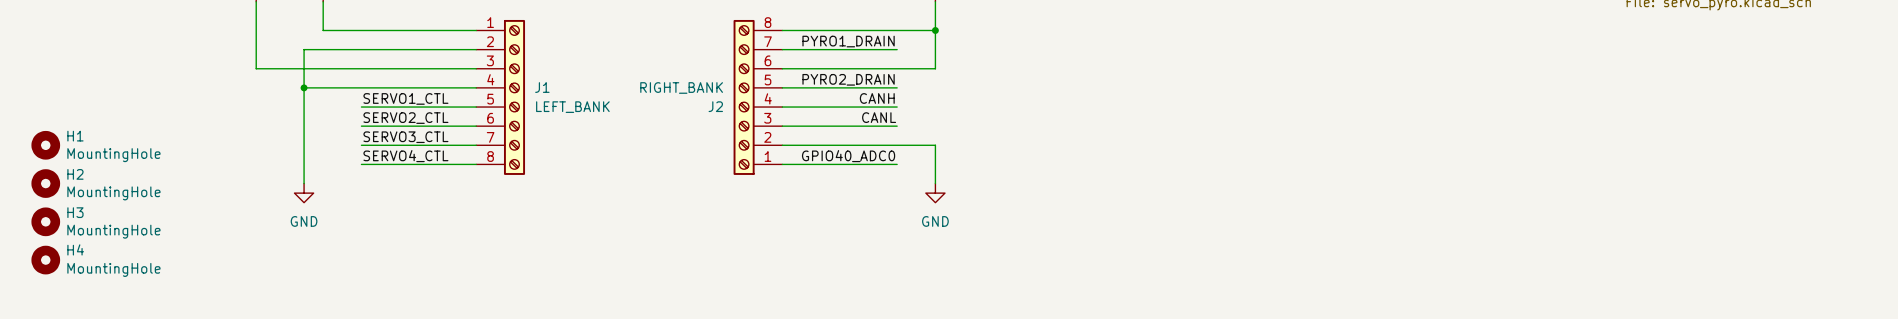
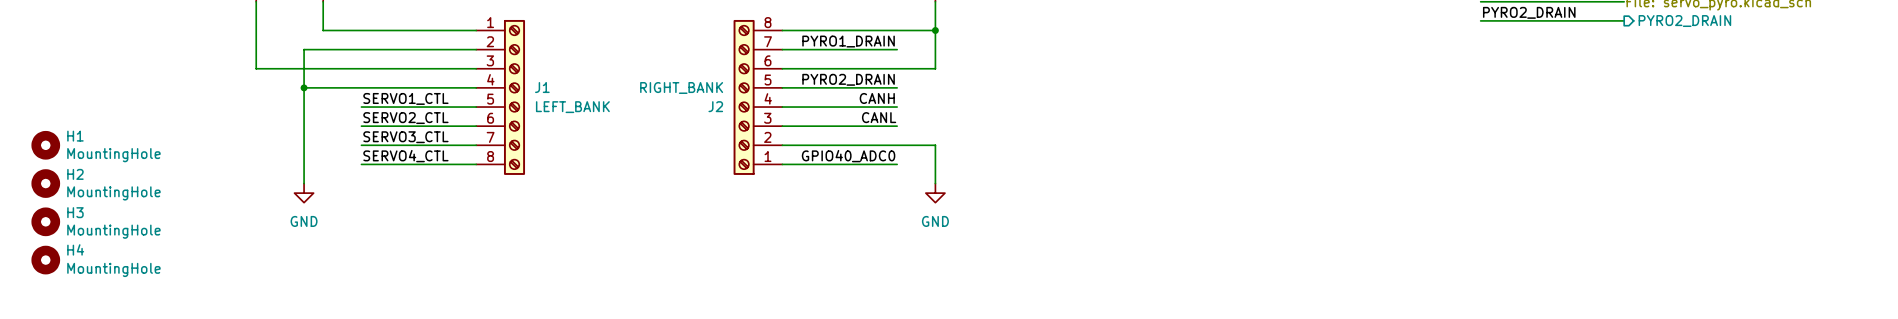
wire: none -> (1480, 1) (1624, 1)
label: none -> PYRO2_DRAIN (1529, 12)
wire: none -> (1480, 20) (1624, 20)
sheet pin: none -> PYRO2_DRAIN (1684, 21)

